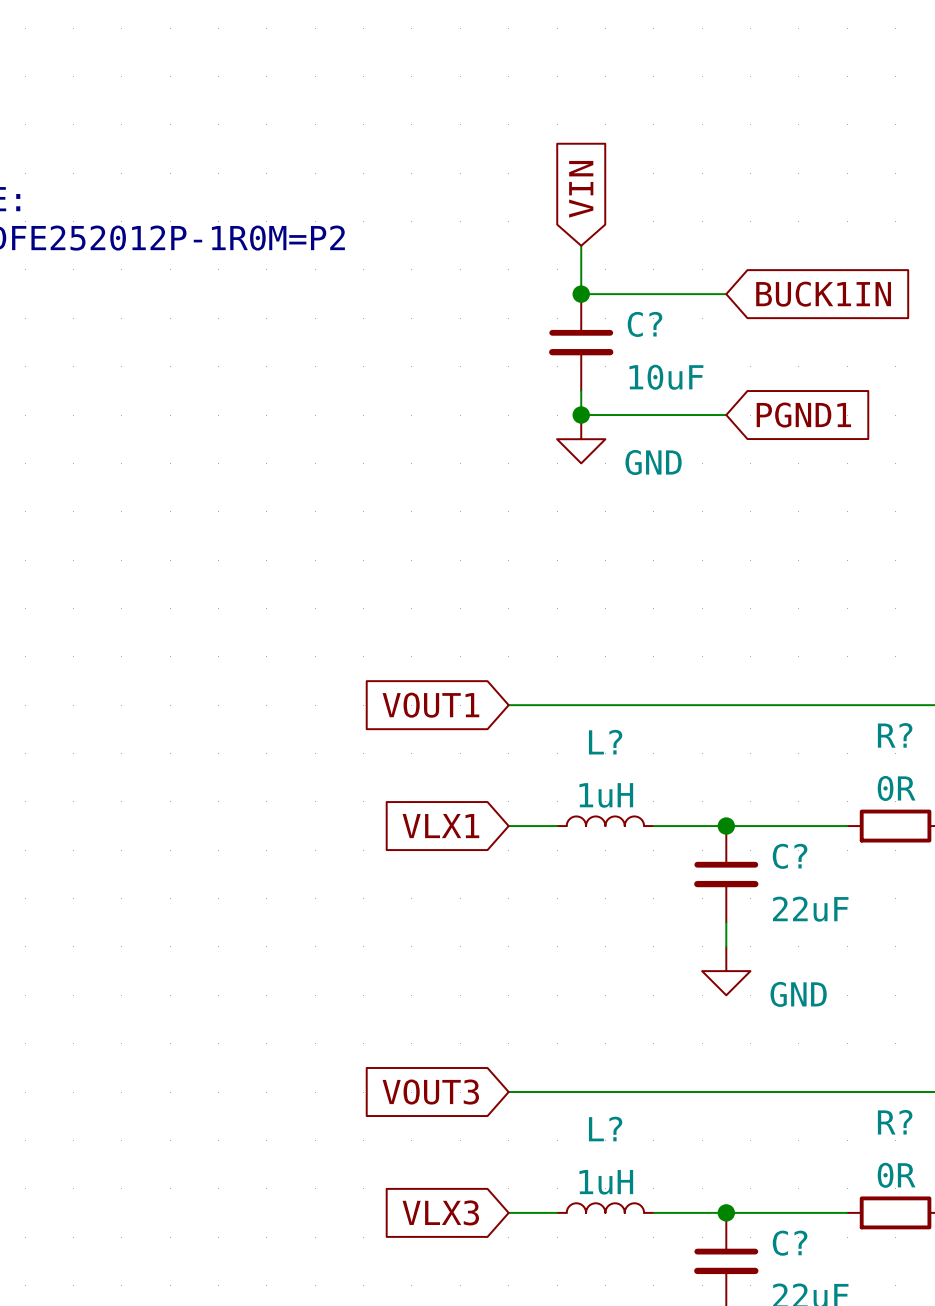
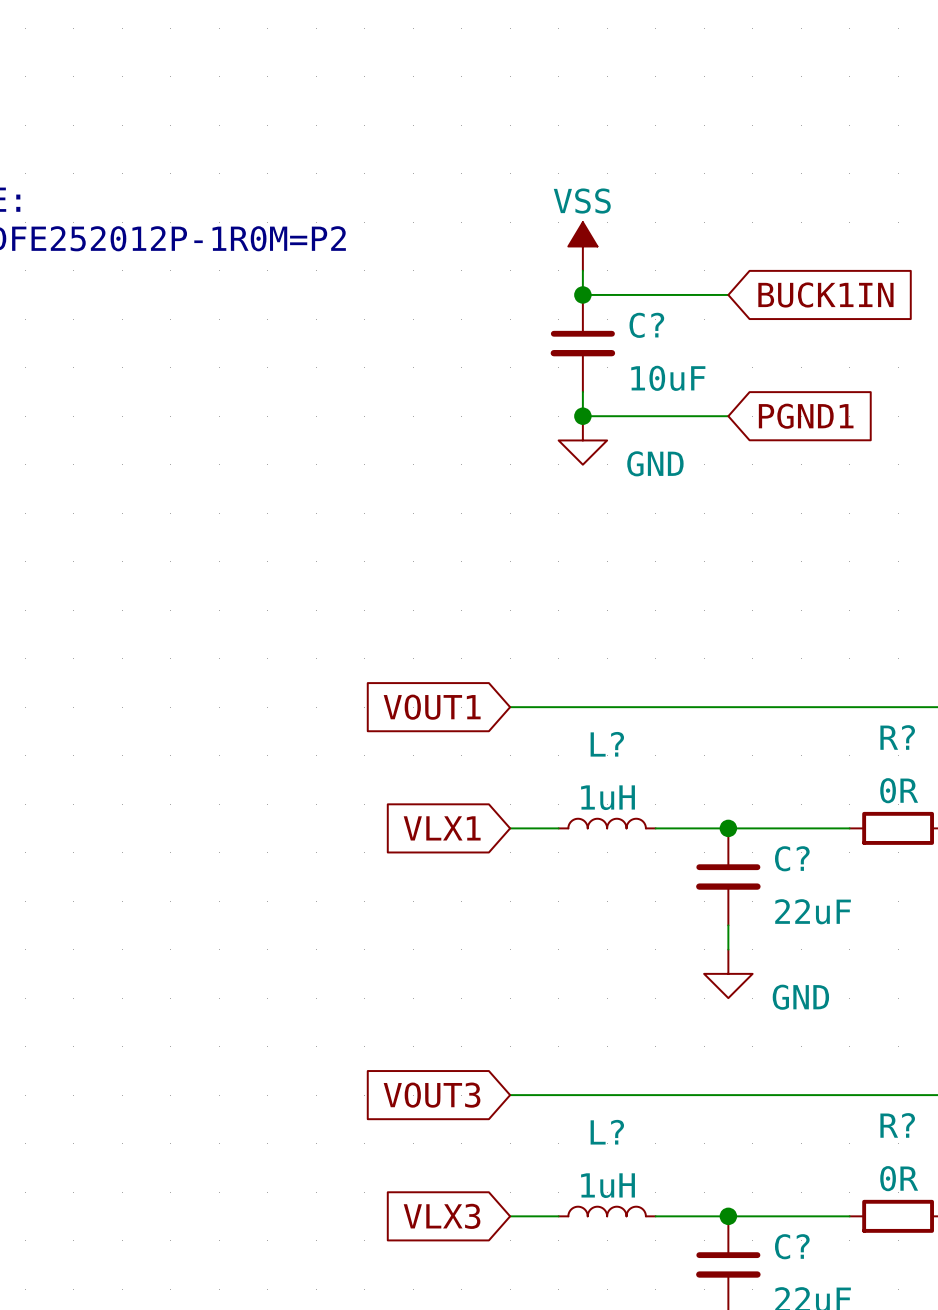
global label: VIN (581, 189) -> none
power symbol: none -> VSS (582, 246)

